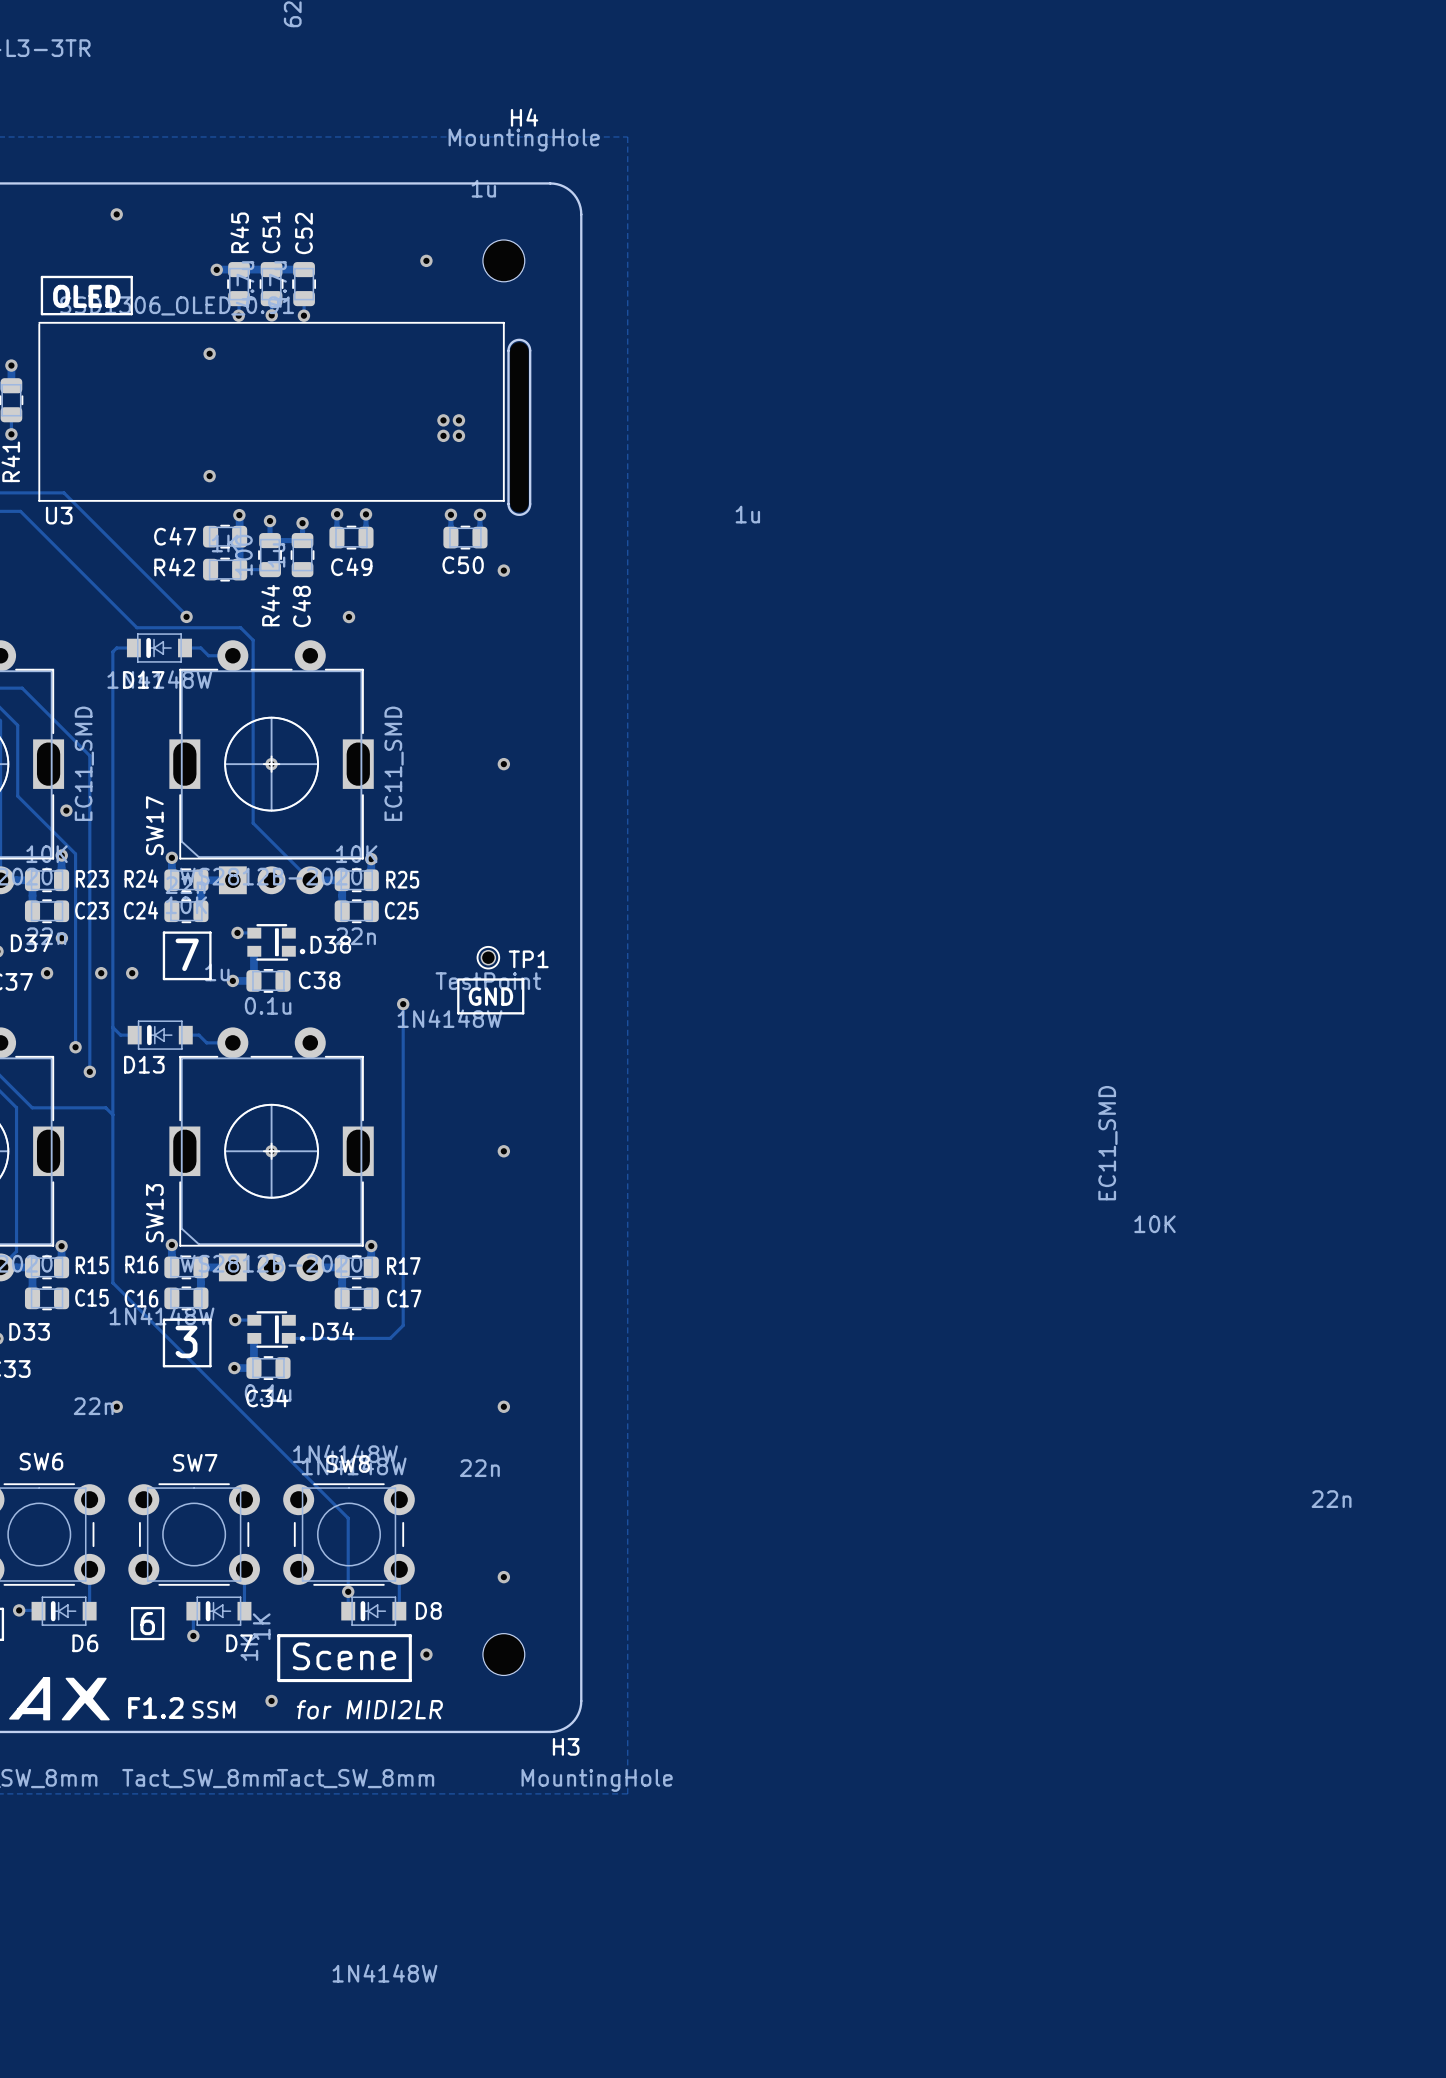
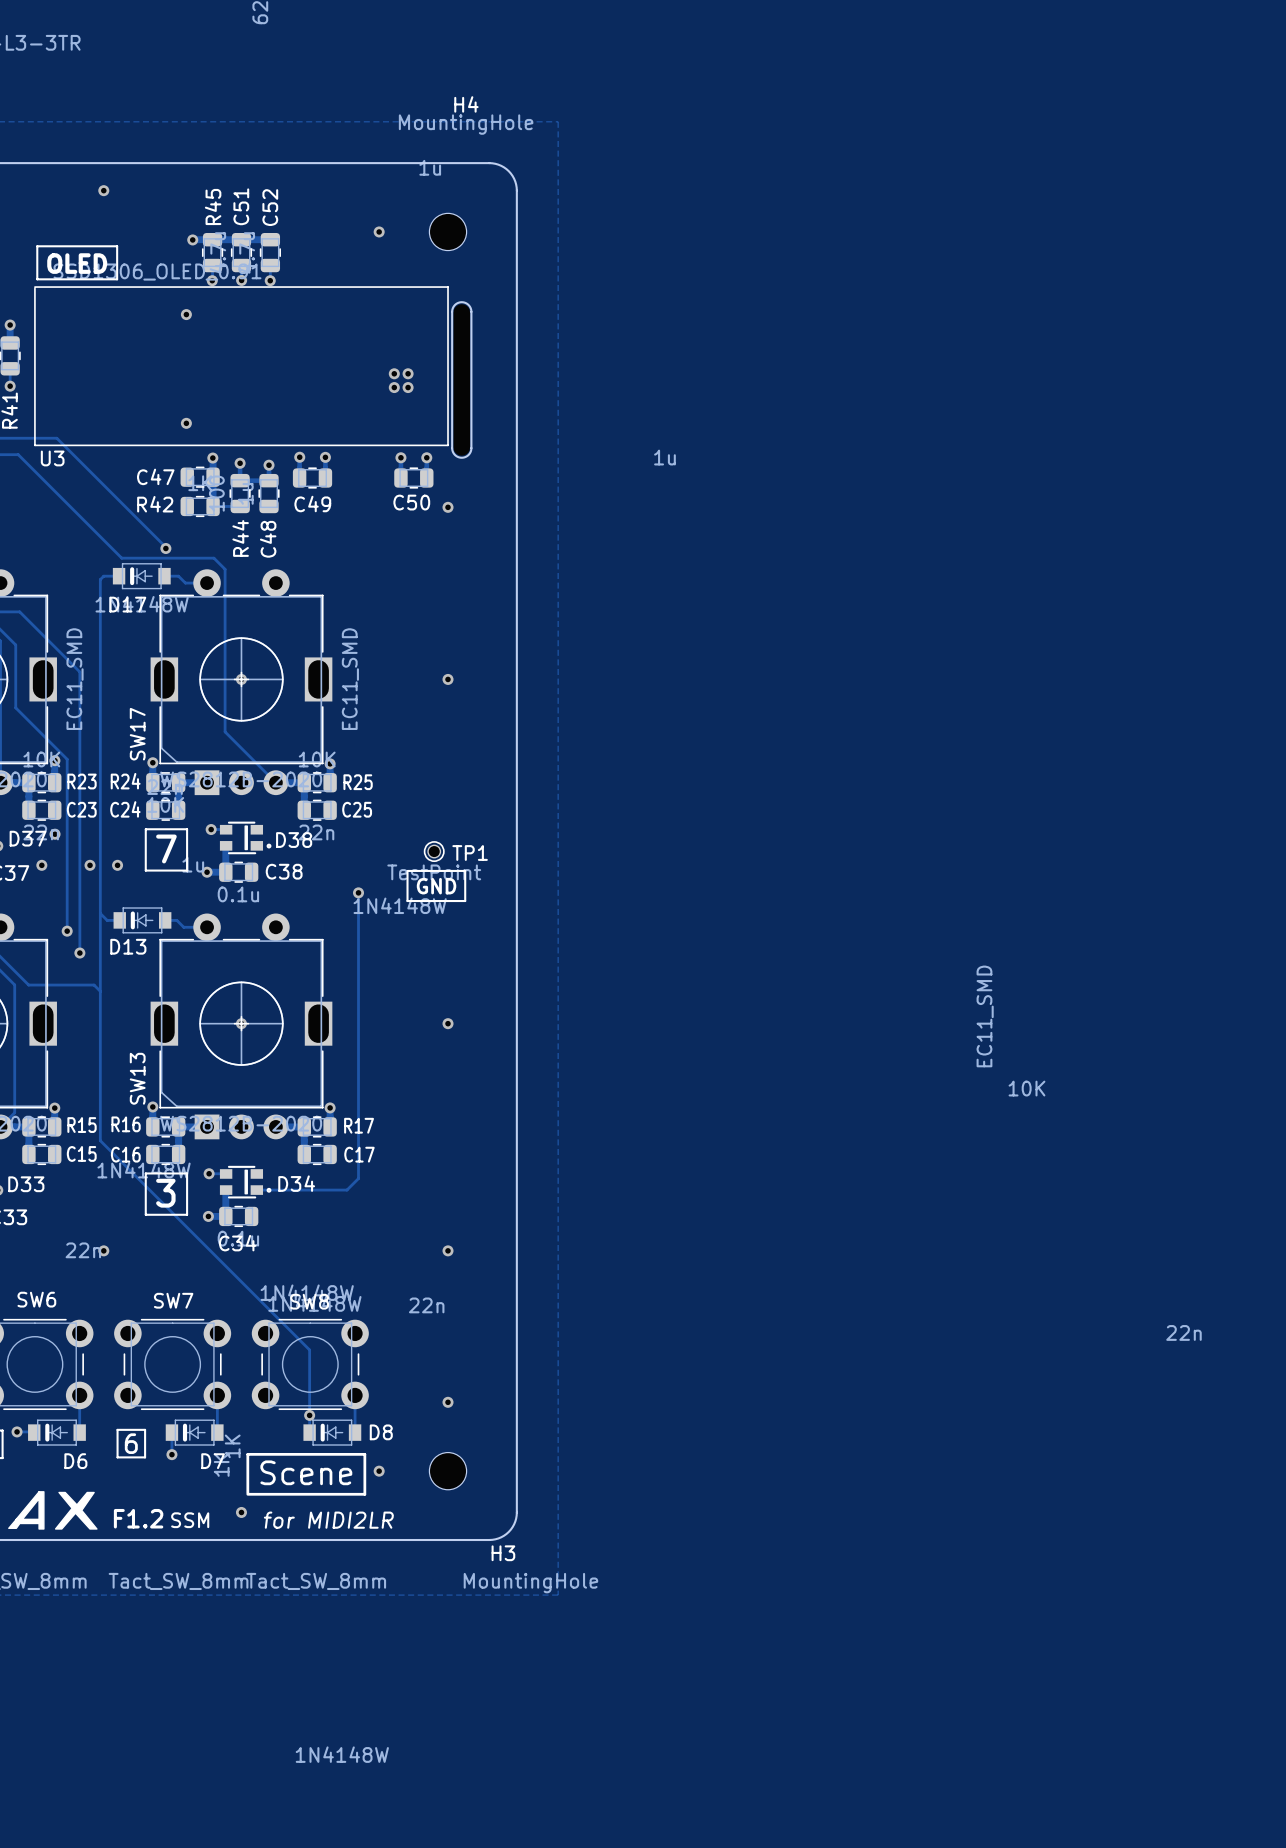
via: (349, 617) -> none
via: (66, 810) -> none

